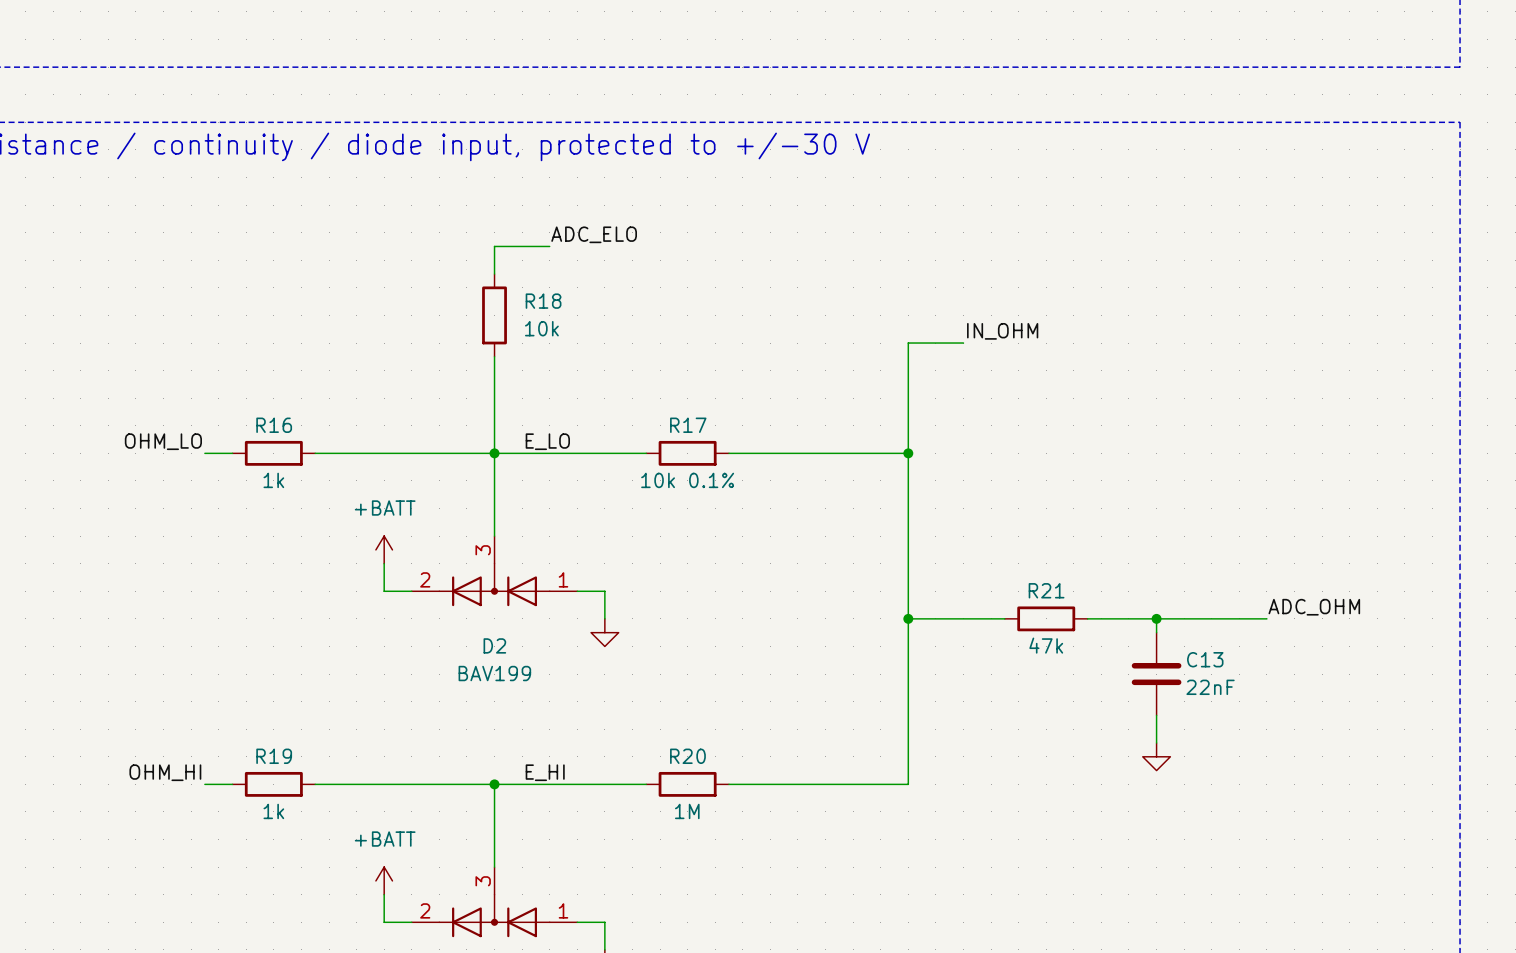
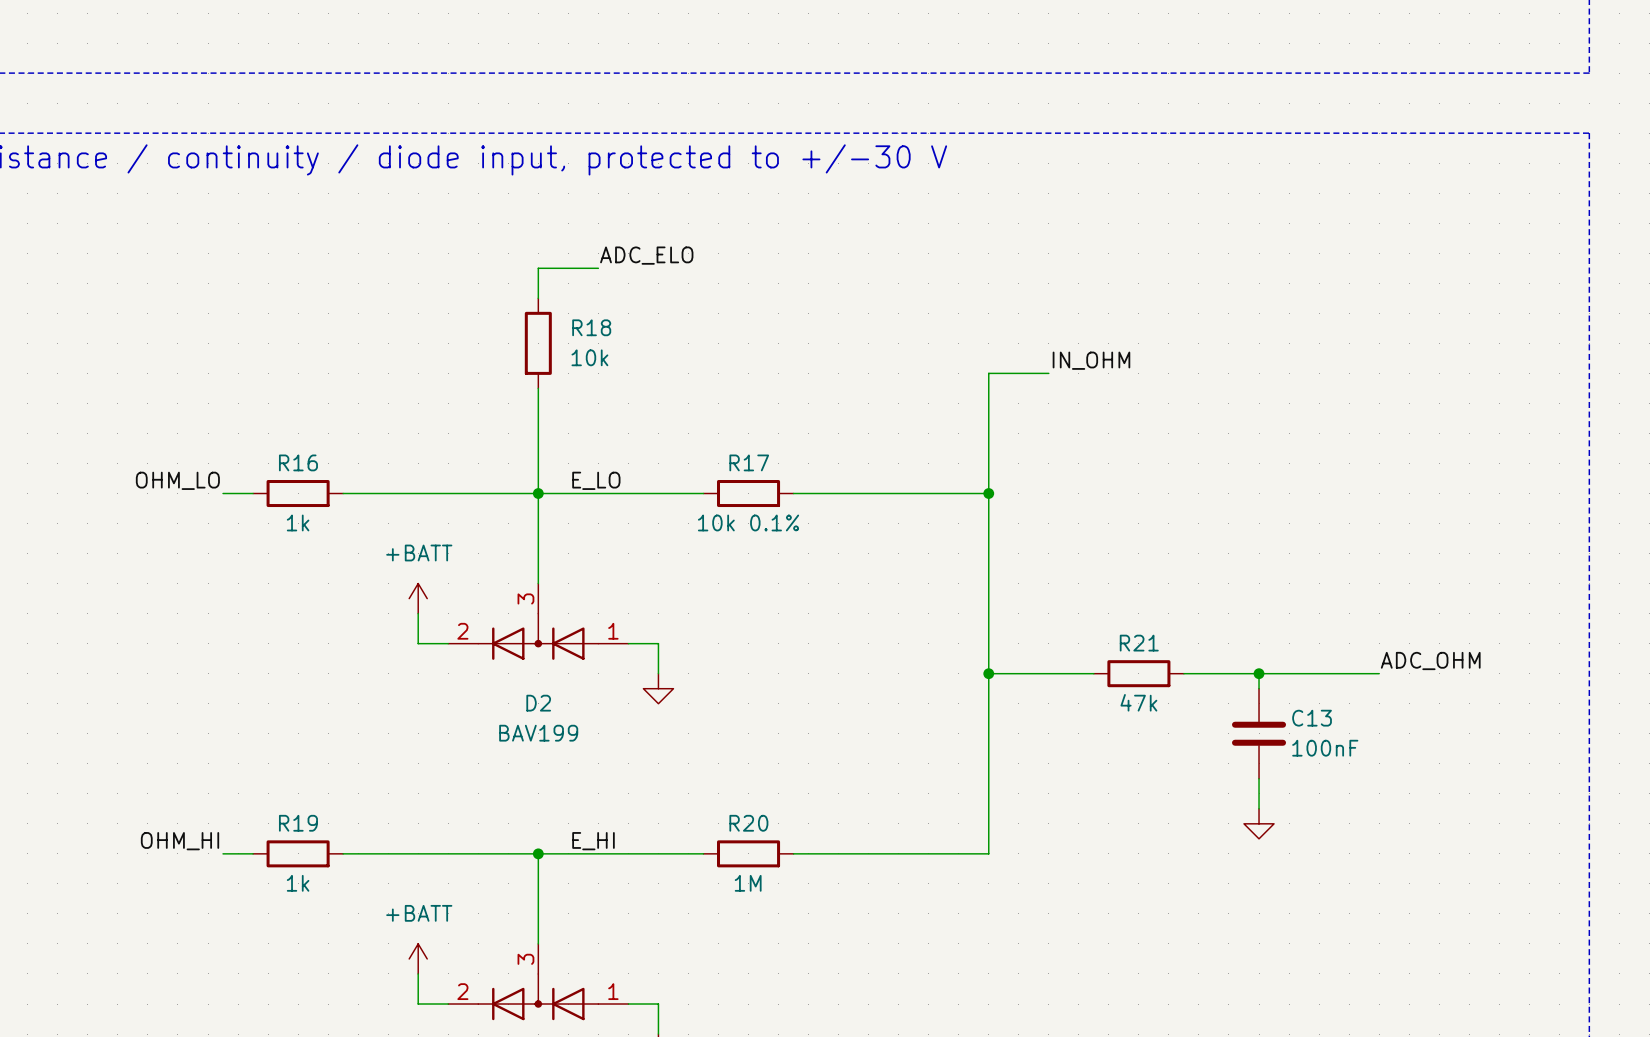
C13 value: 22nF (1210, 687) -> 100nF (1325, 748)

